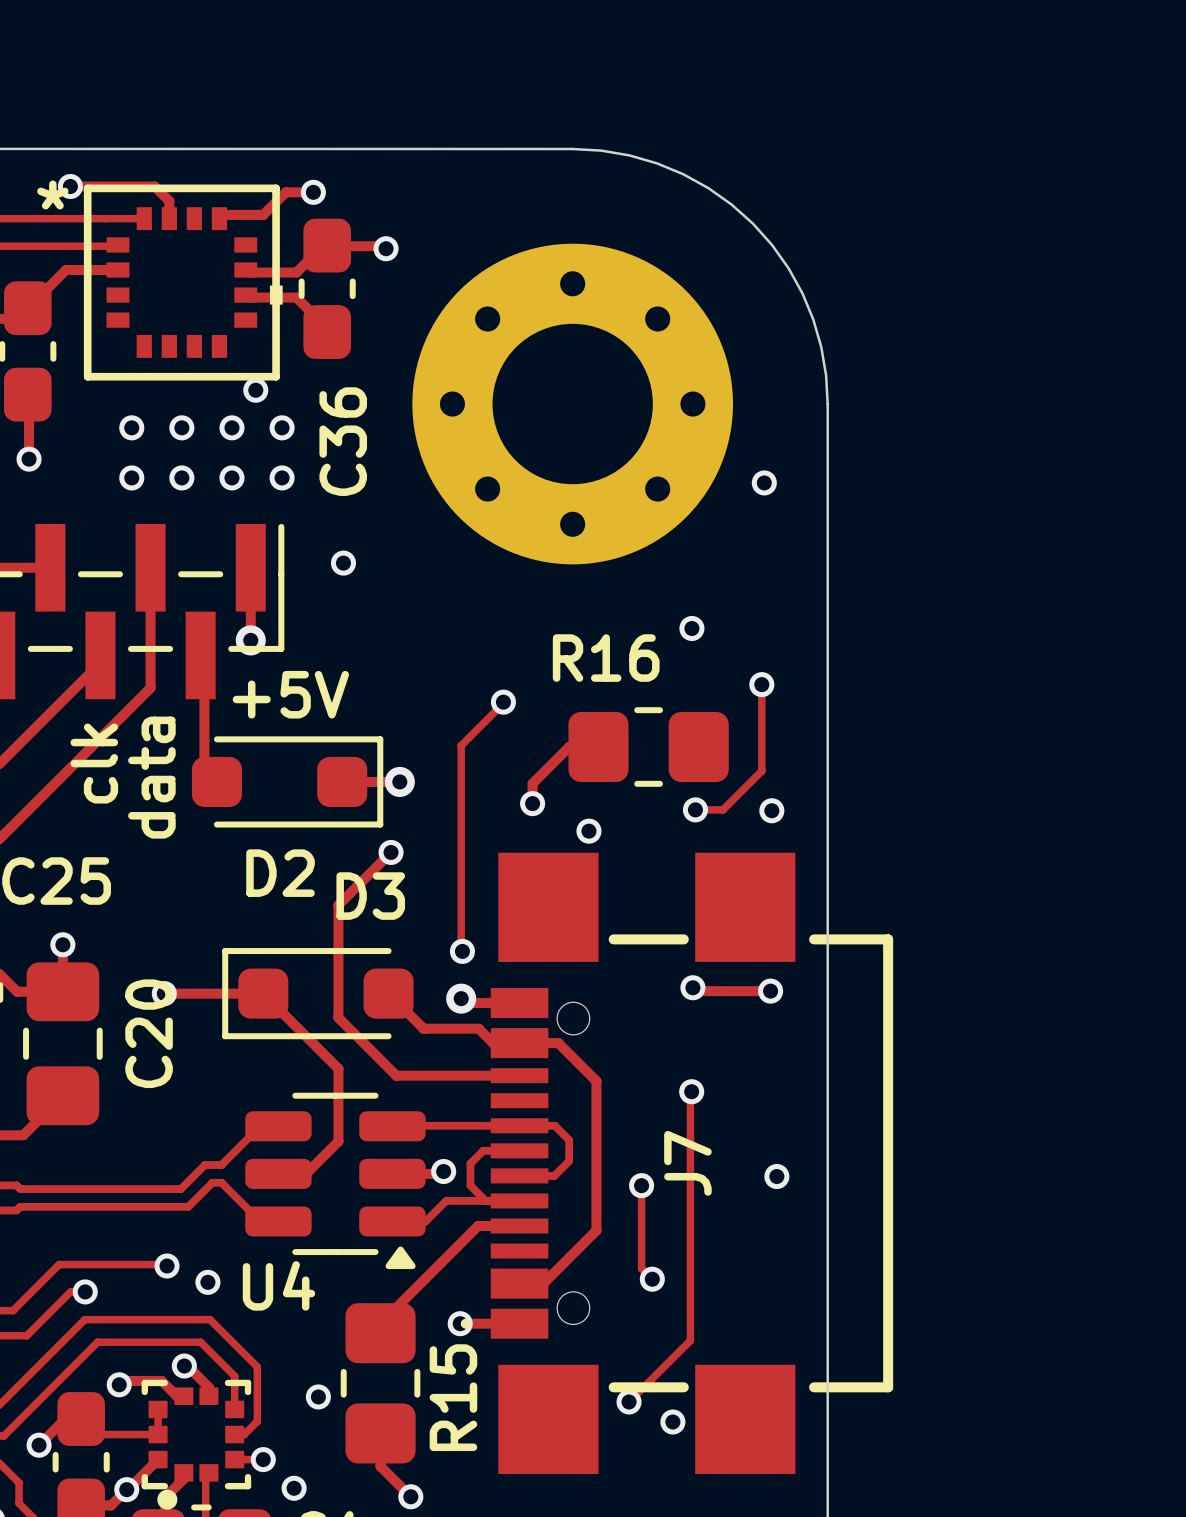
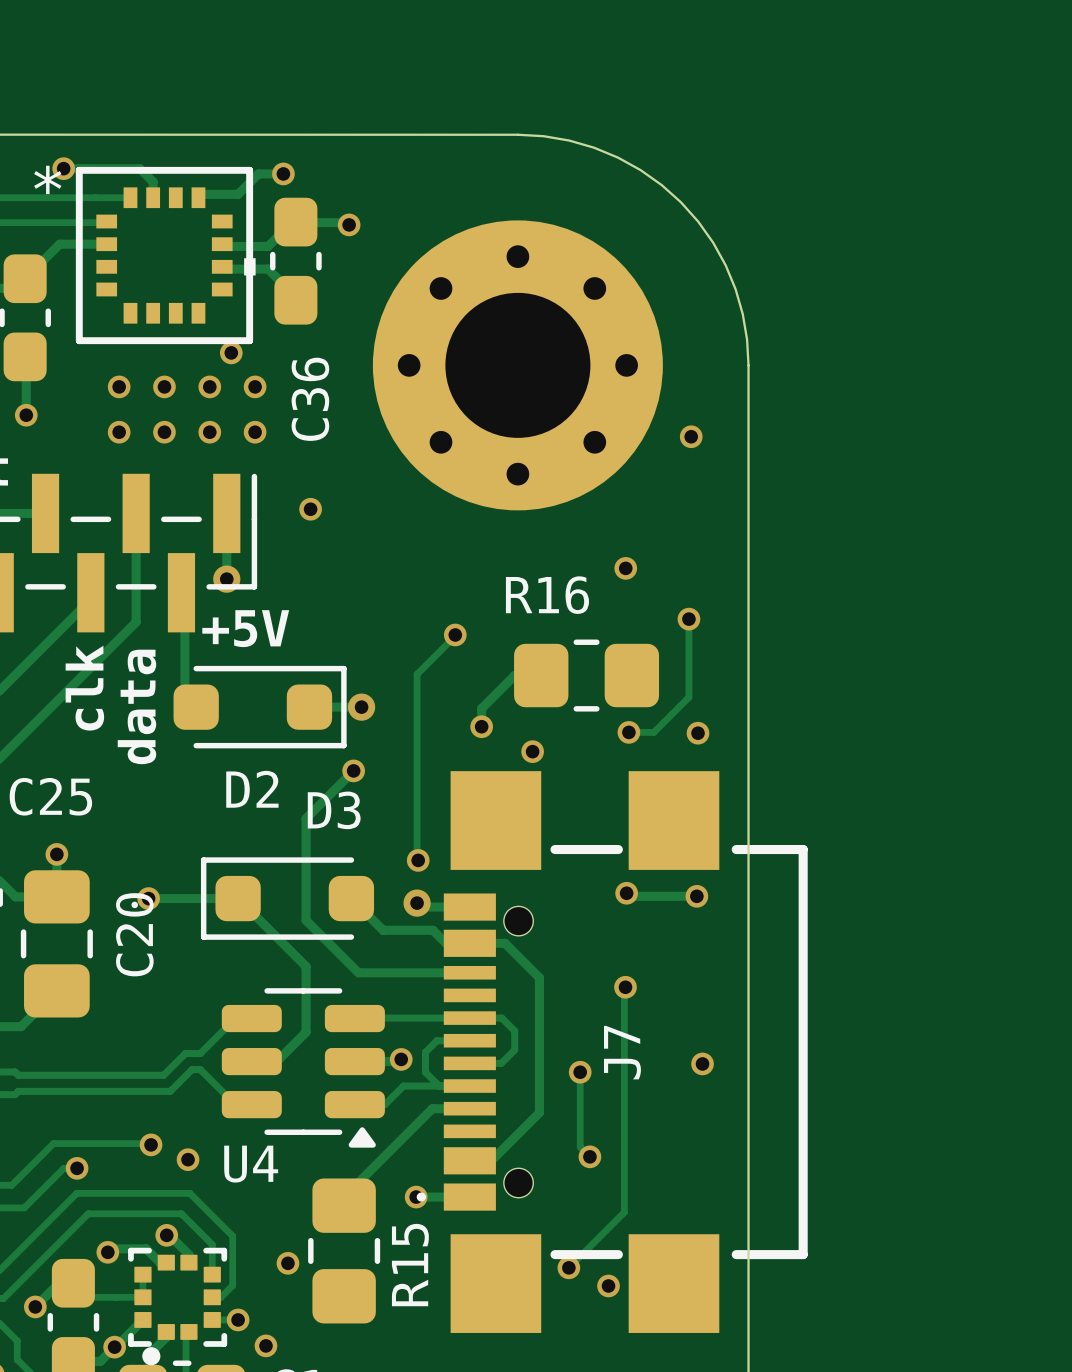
track: (380, 1433) (380, 1466) (410, 1496) -> none
via: (410, 1496) -> none

